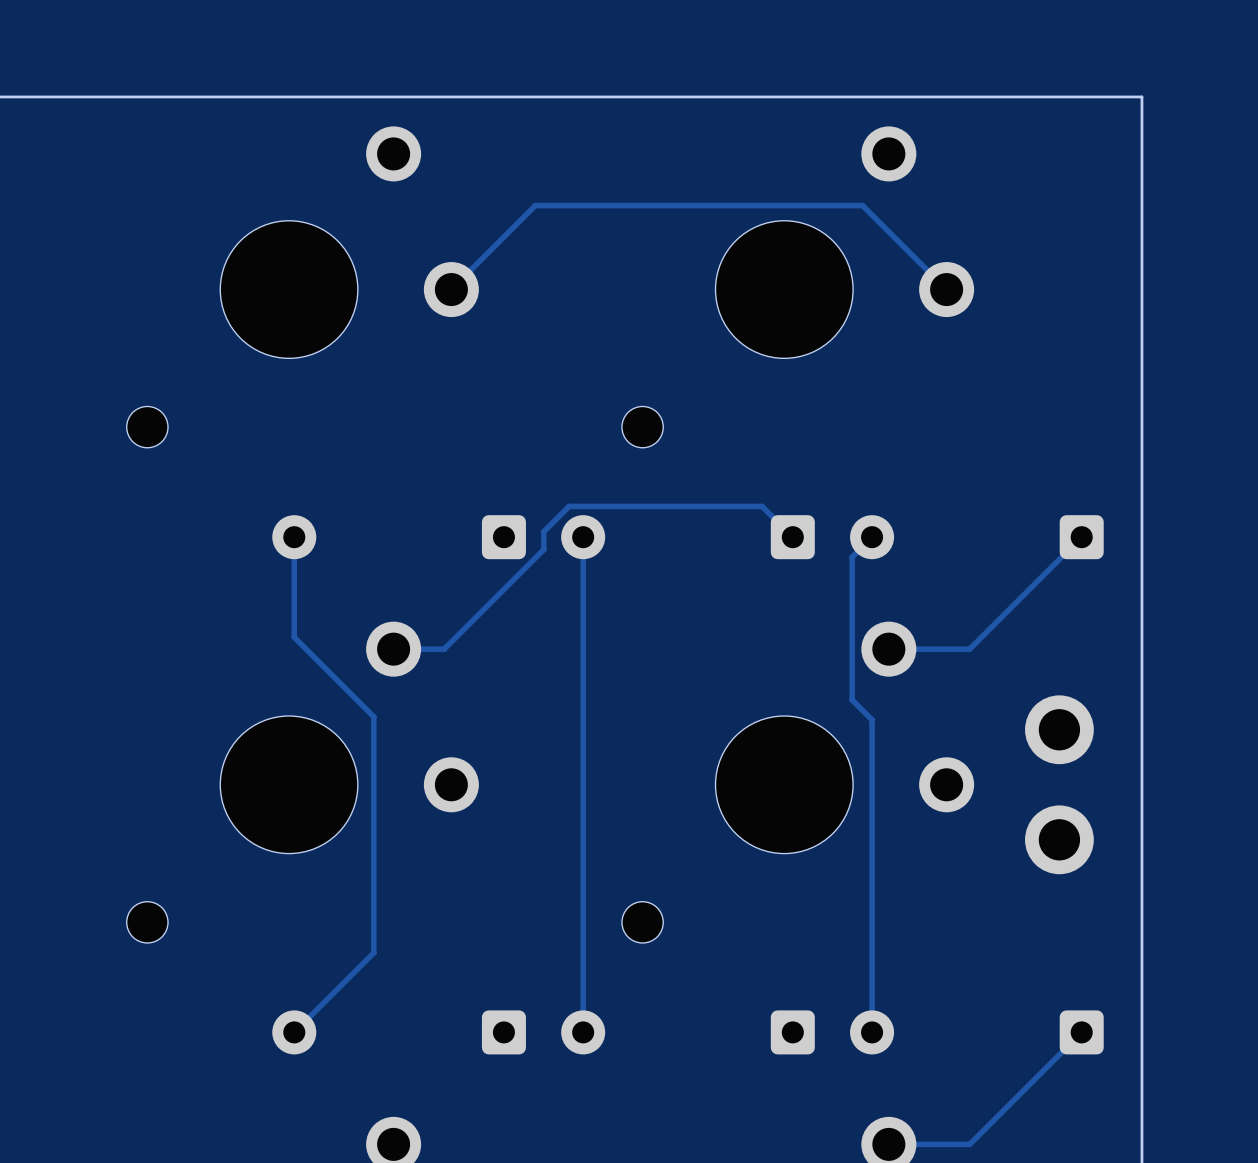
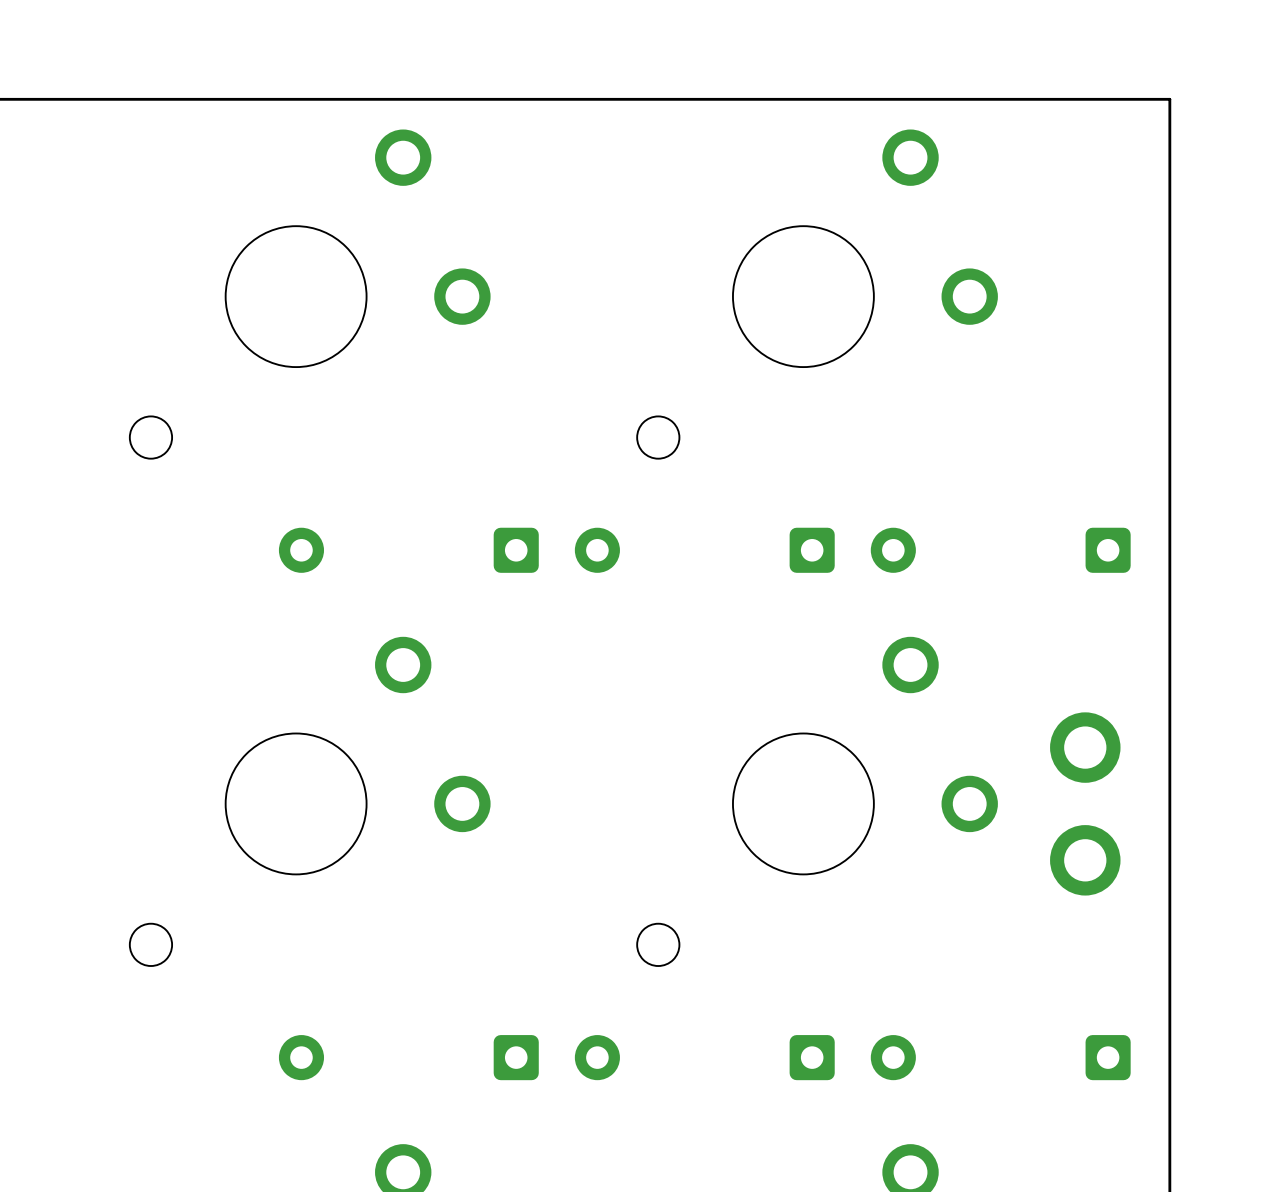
track: (946, 289) (862, 205) (535, 205) (451, 289) -> none
track: (294, 537) (294, 637) (373, 716) (373, 952) (294, 1032) -> none
track: (583, 537) (583, 1032) -> none
track: (792, 537) (762, 506) (569, 506) (543, 531) (543, 549) (444, 649) (393, 649) -> none
track: (872, 537) (852, 557) (852, 699) (872, 719) (872, 1032) -> none
track: (1081, 537) (969, 649) (888, 649) -> none
track: (1081, 1032) (969, 1144) (888, 1144) -> none

